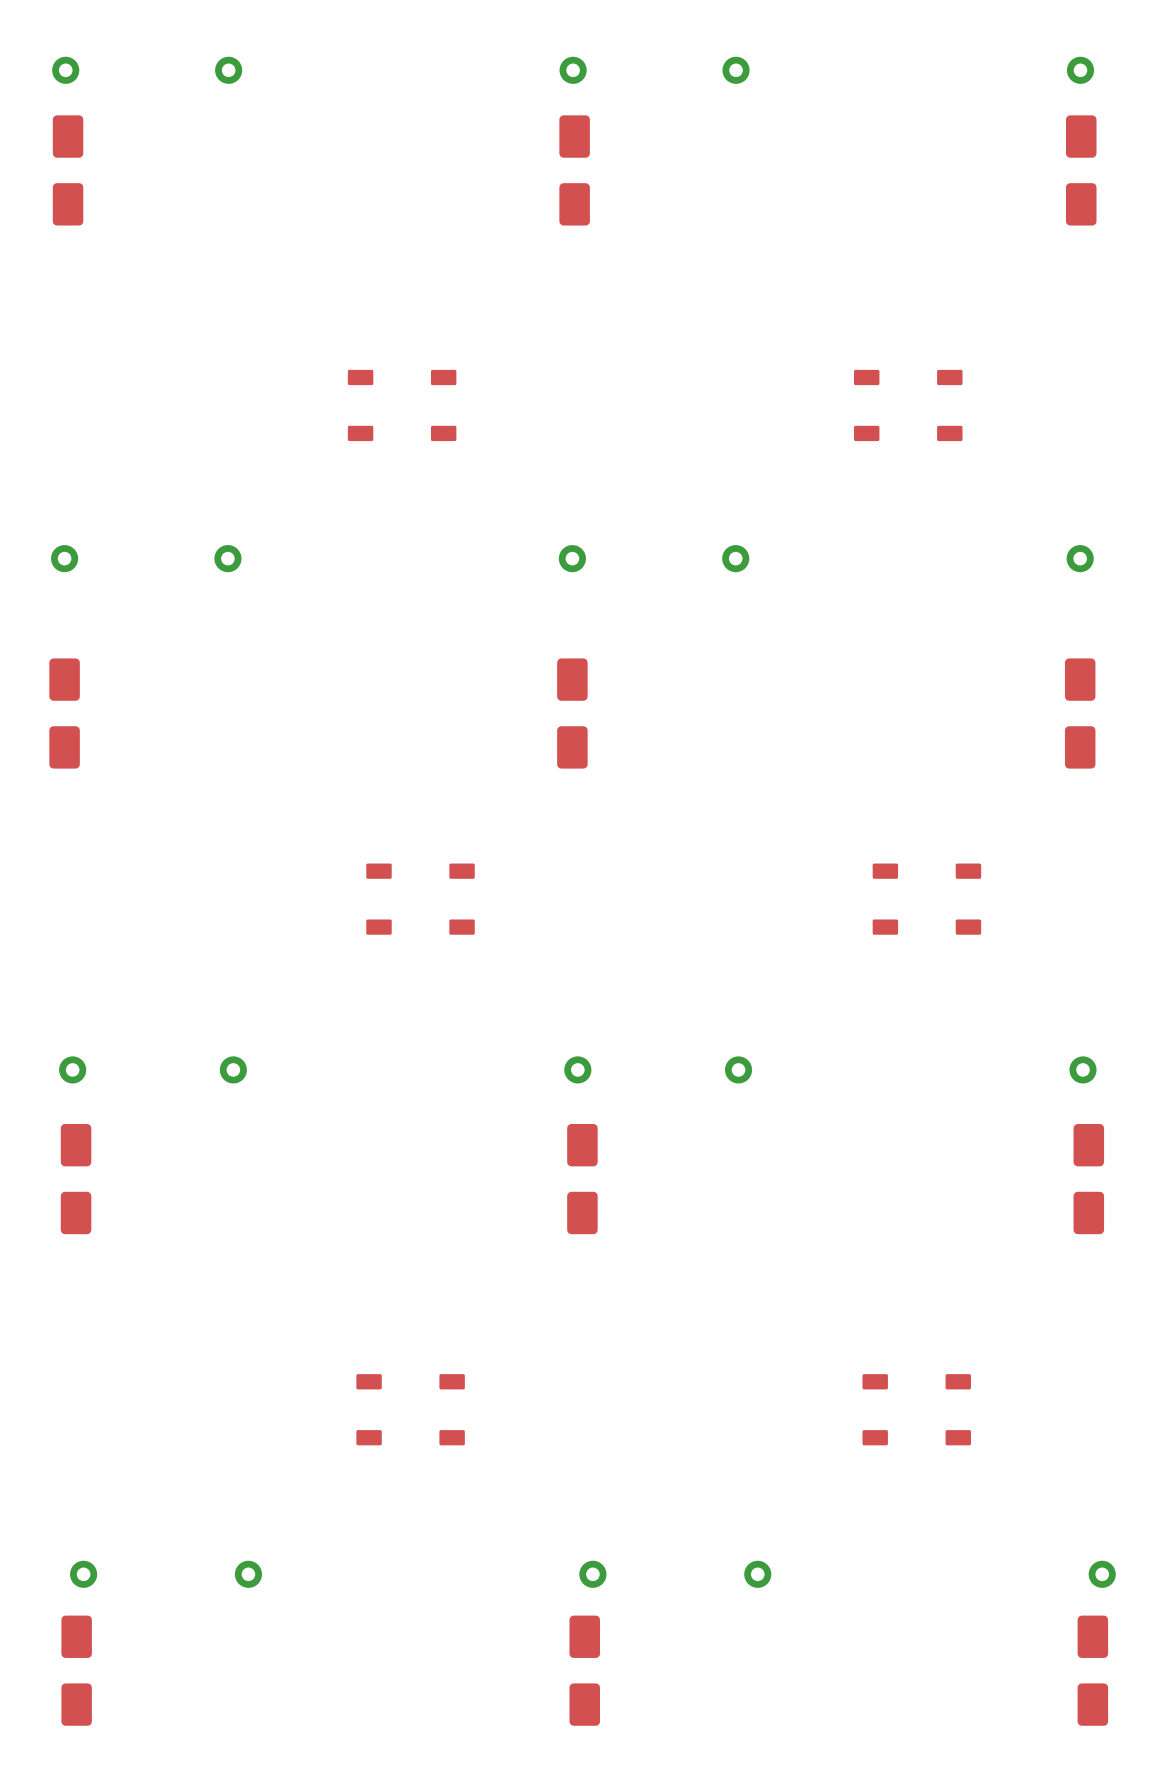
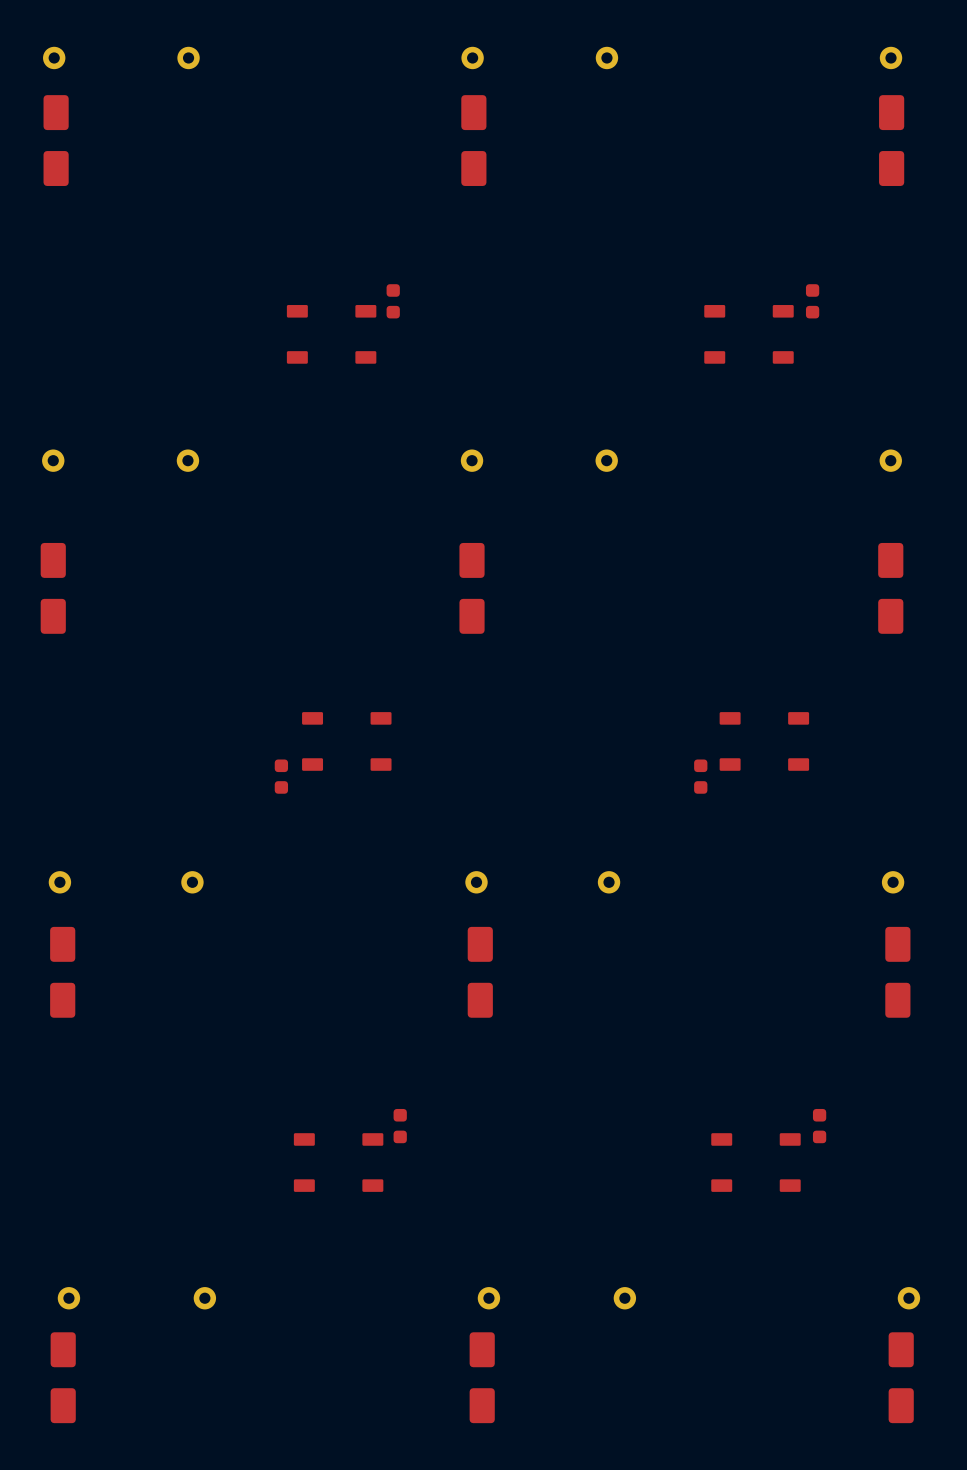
part: none -> (393, 301)
part: none -> (812, 301)
part: none -> (281, 776)
part: none -> (700, 776)
part: none -> (400, 1126)
part: none -> (819, 1126)

